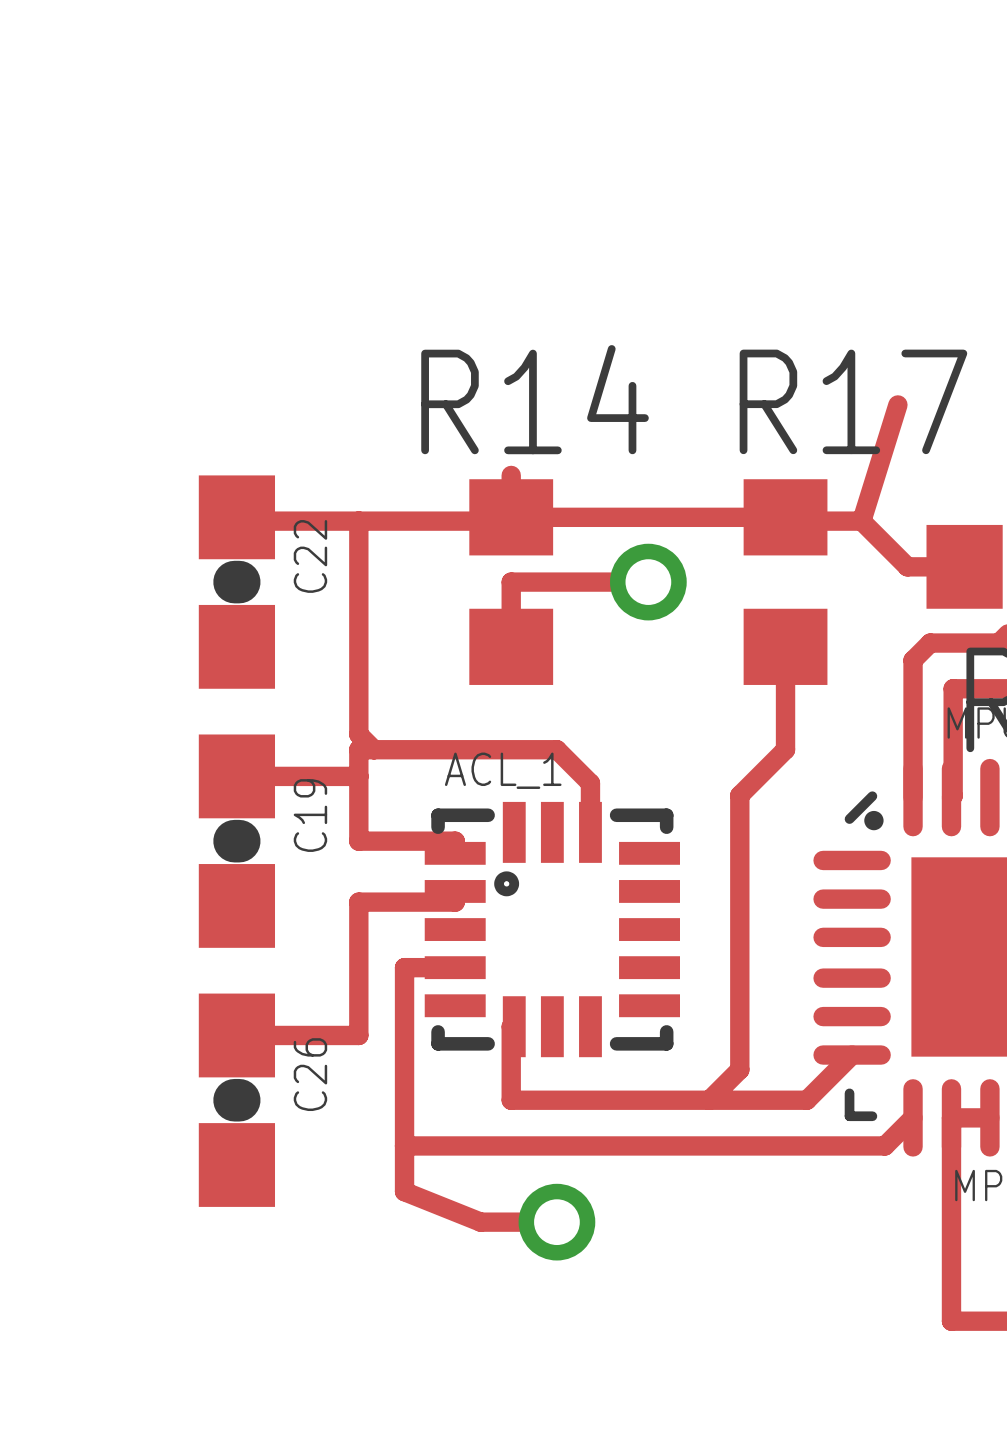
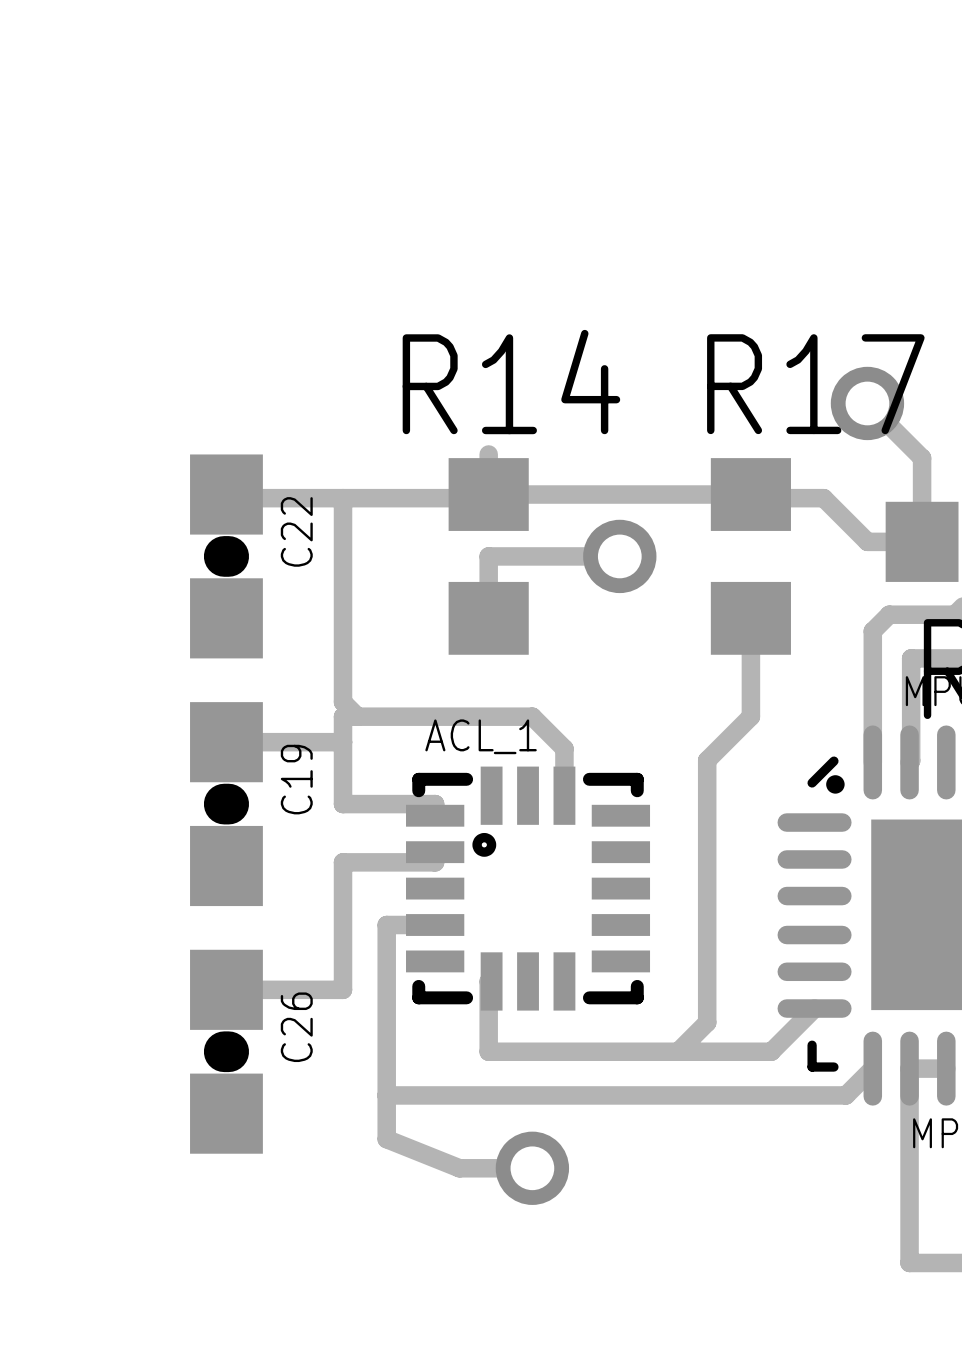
track: (897, 404) (861, 521) -> none
track: none -> (867, 403) (922, 458) (922, 541)
via: none -> (867, 403)

